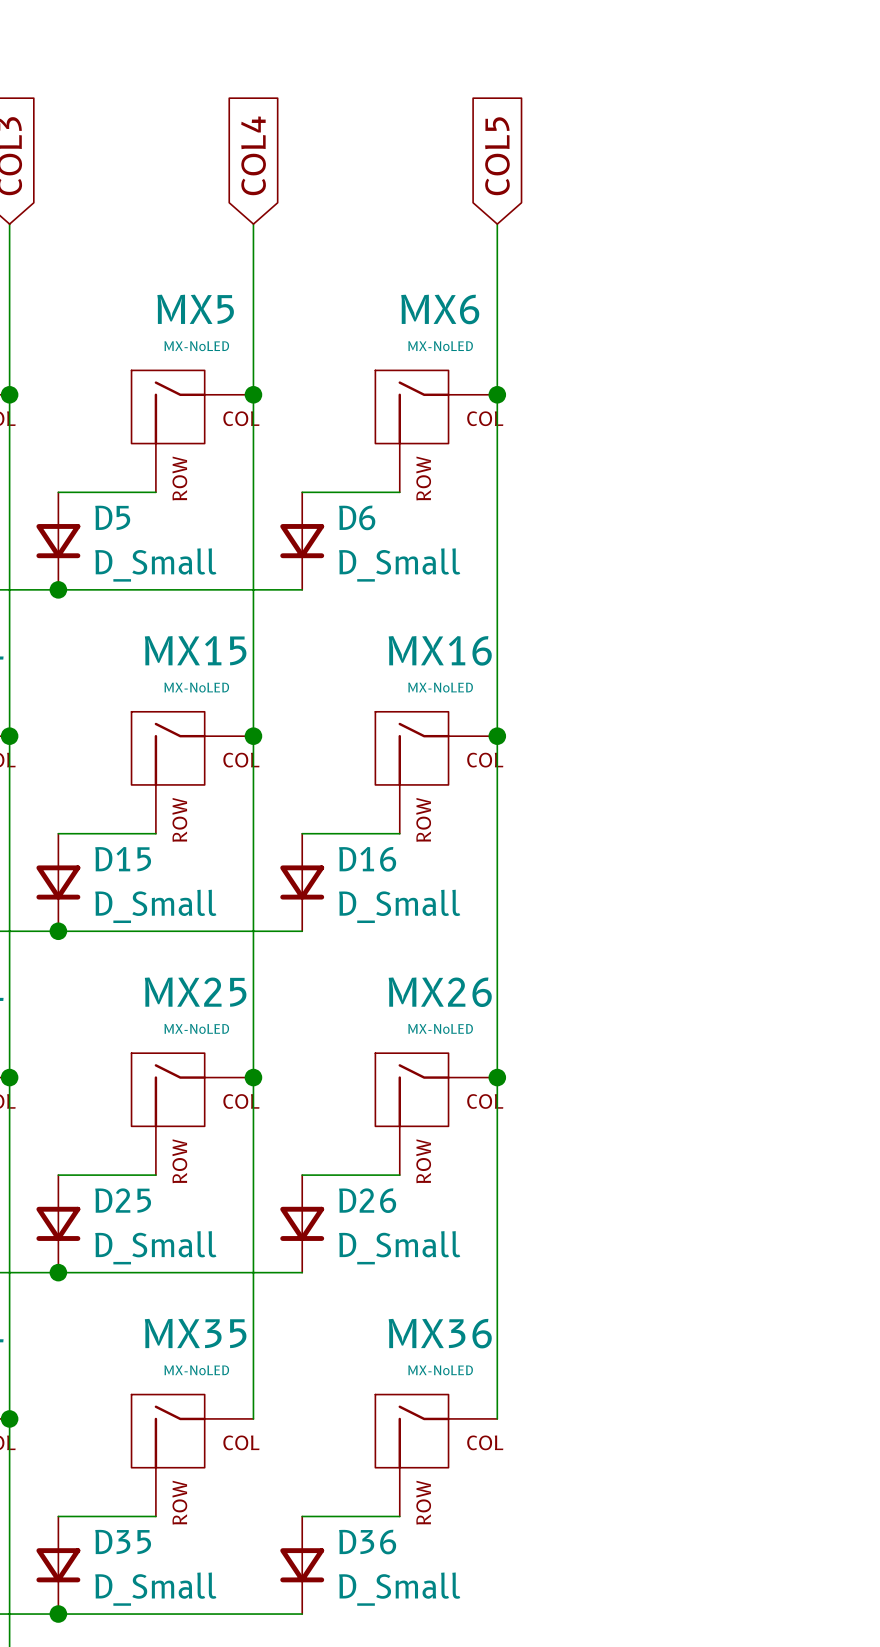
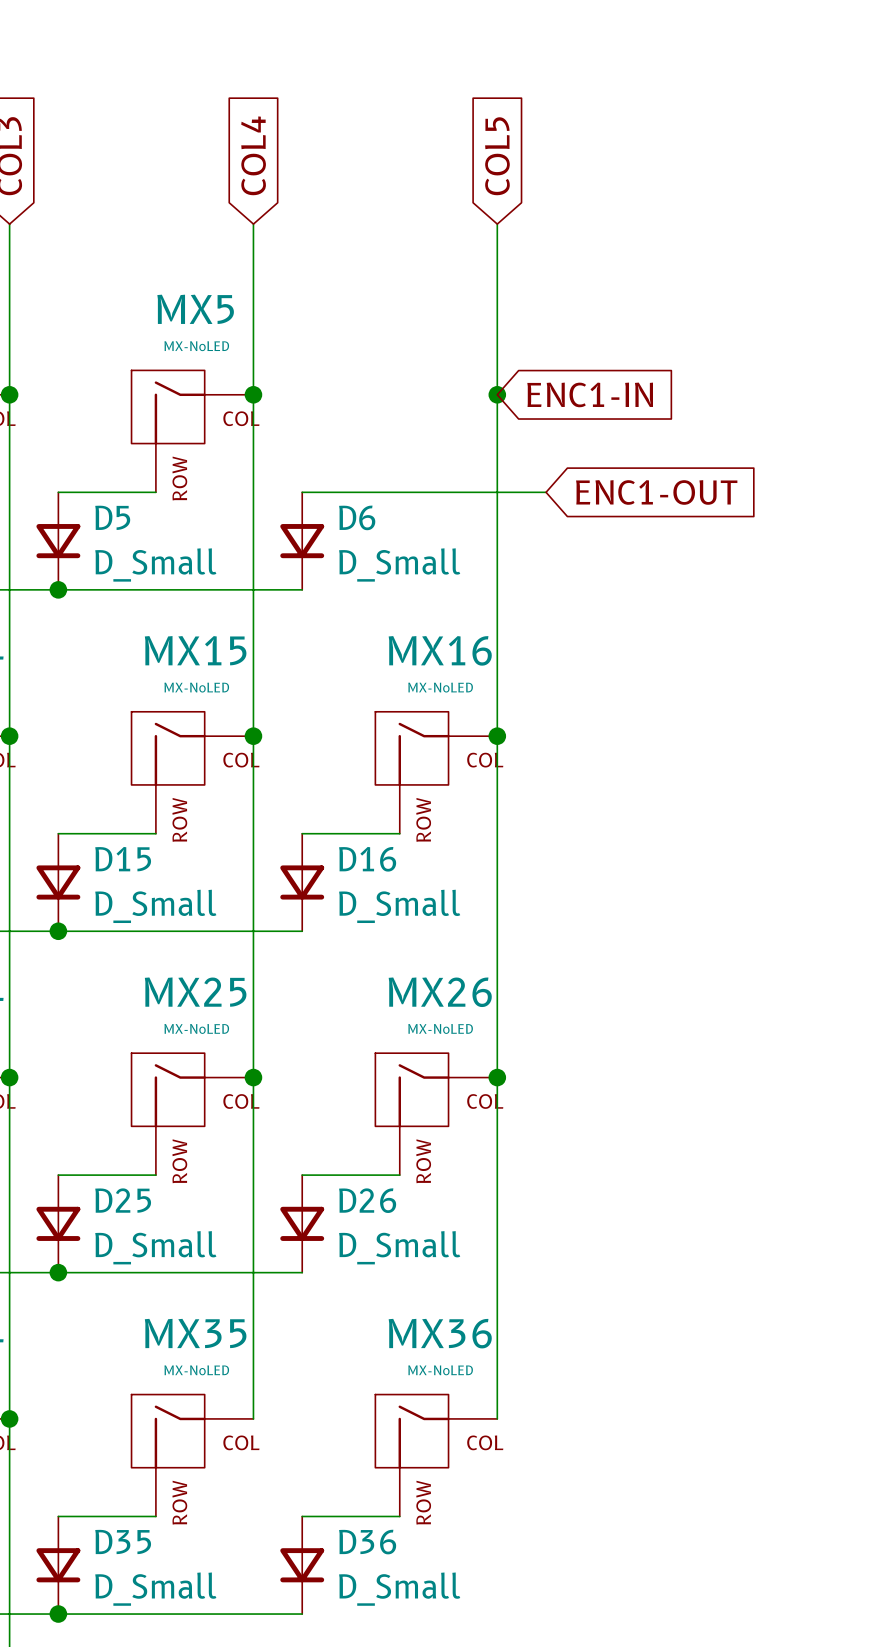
global label: none -> ENC1-IN (590, 394)
MX6: MX-NoLED (436, 431) -> none
wire: none -> (399, 492) (546, 492)
global label: none -> ENC1-OUT (656, 492)

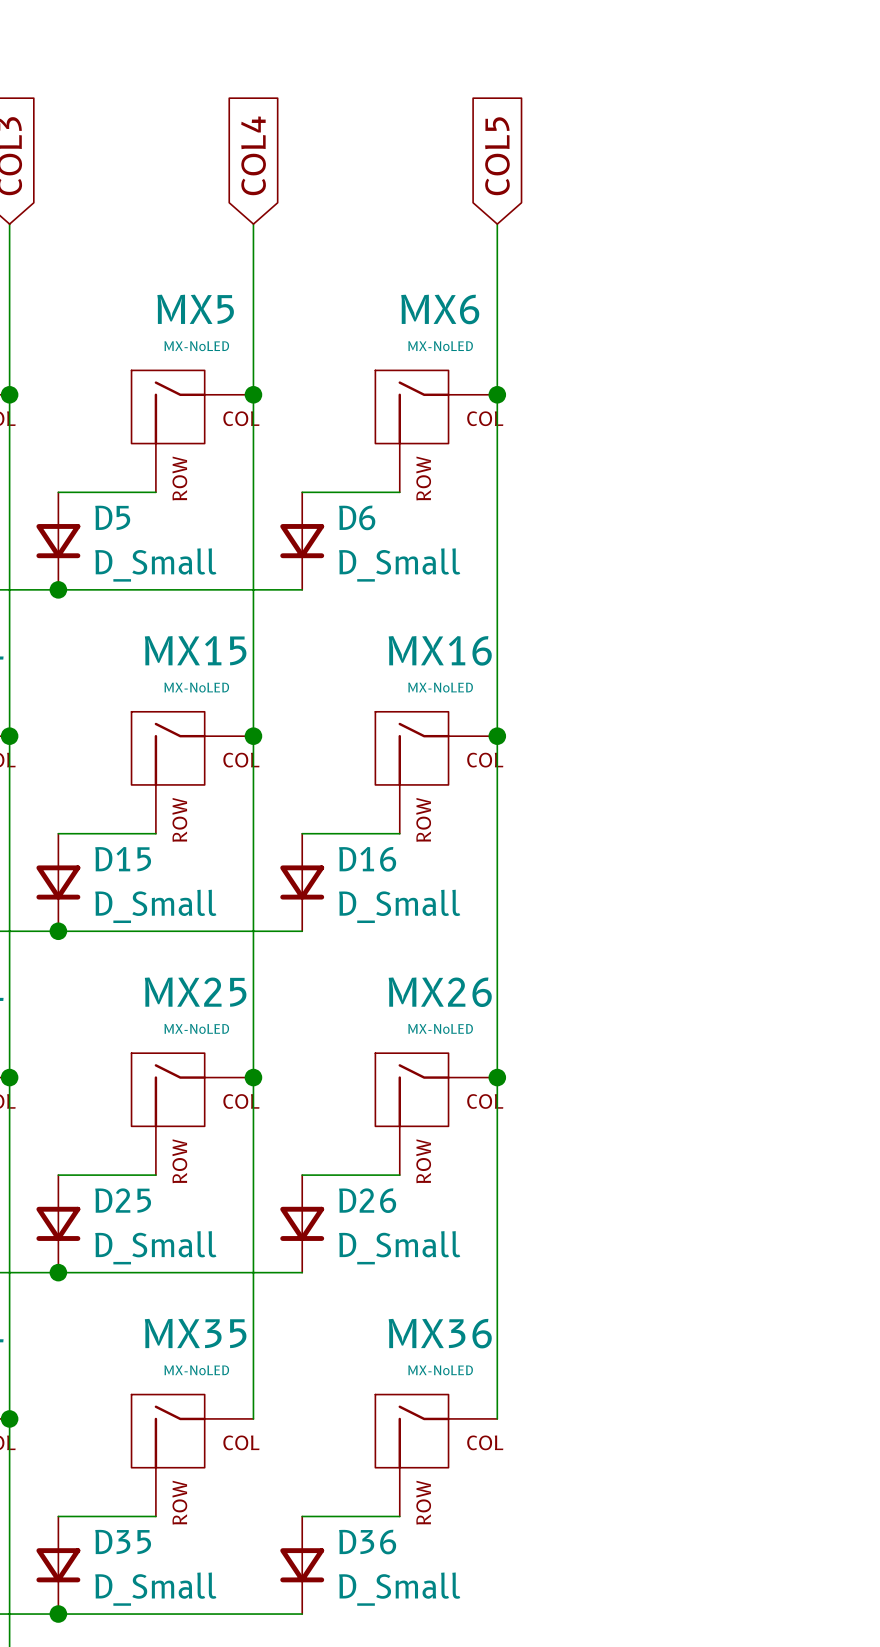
global label: ENC1-IN (590, 394) -> none
MX6: none -> MX-NoLED (436, 431)
wire: (399, 492) (546, 492) -> none
global label: ENC1-OUT (656, 492) -> none

